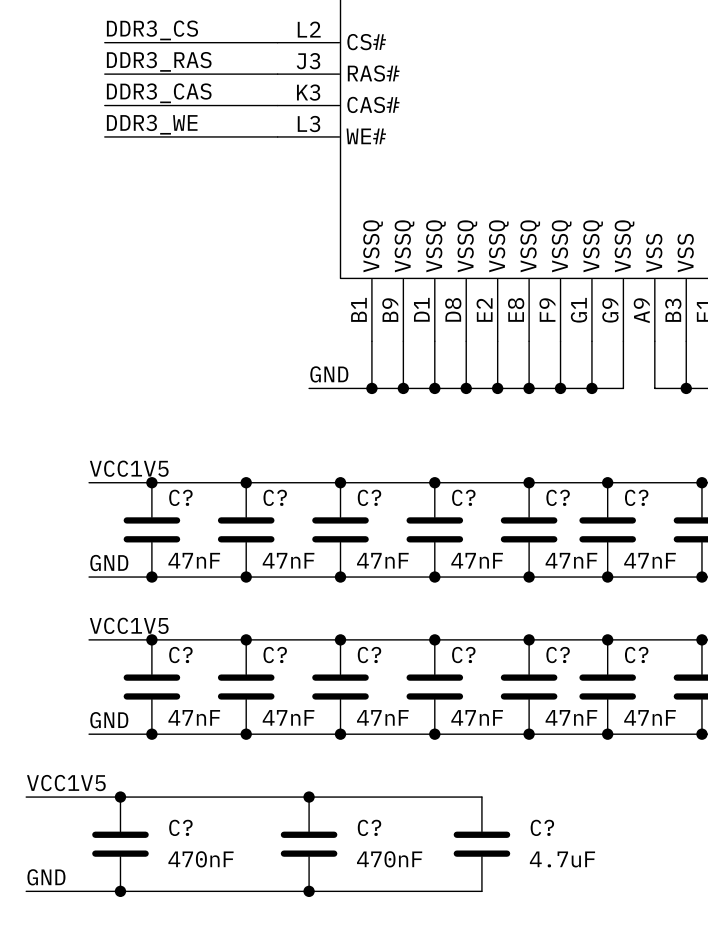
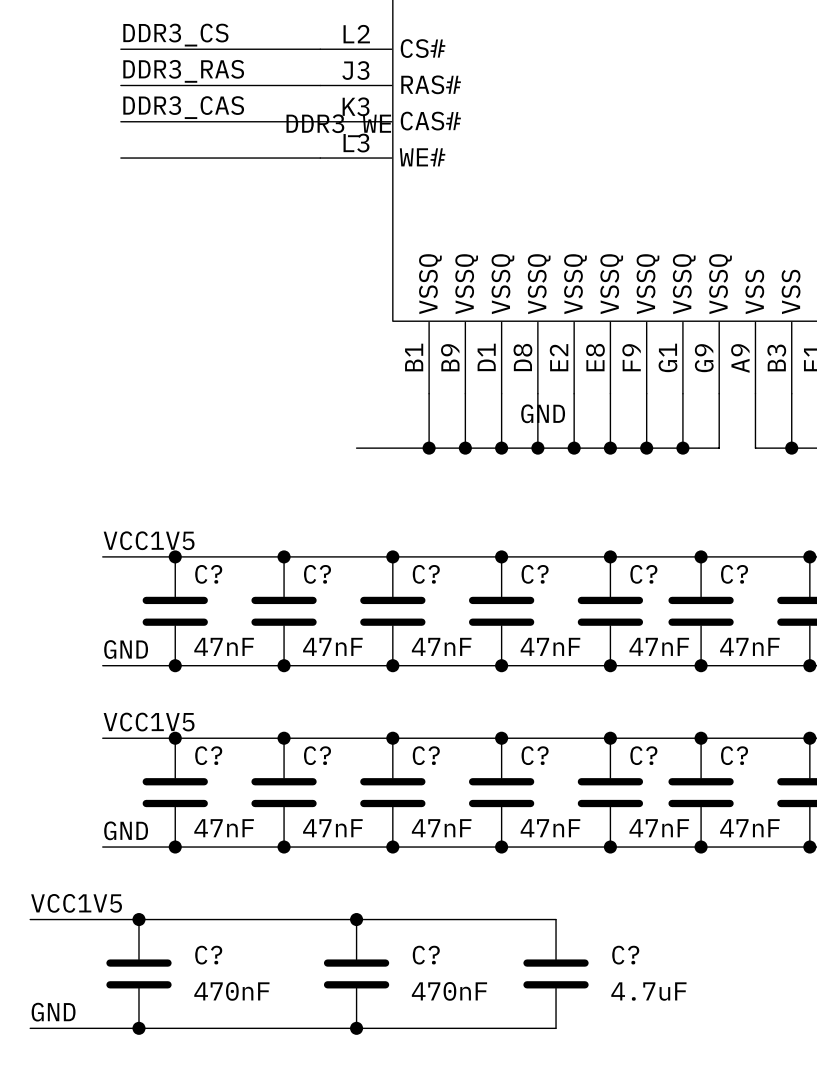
label position: DDR3_WE (152, 124) -> DDR3_WE (338, 125)
label position: GND (329, 374) -> GND (543, 413)

